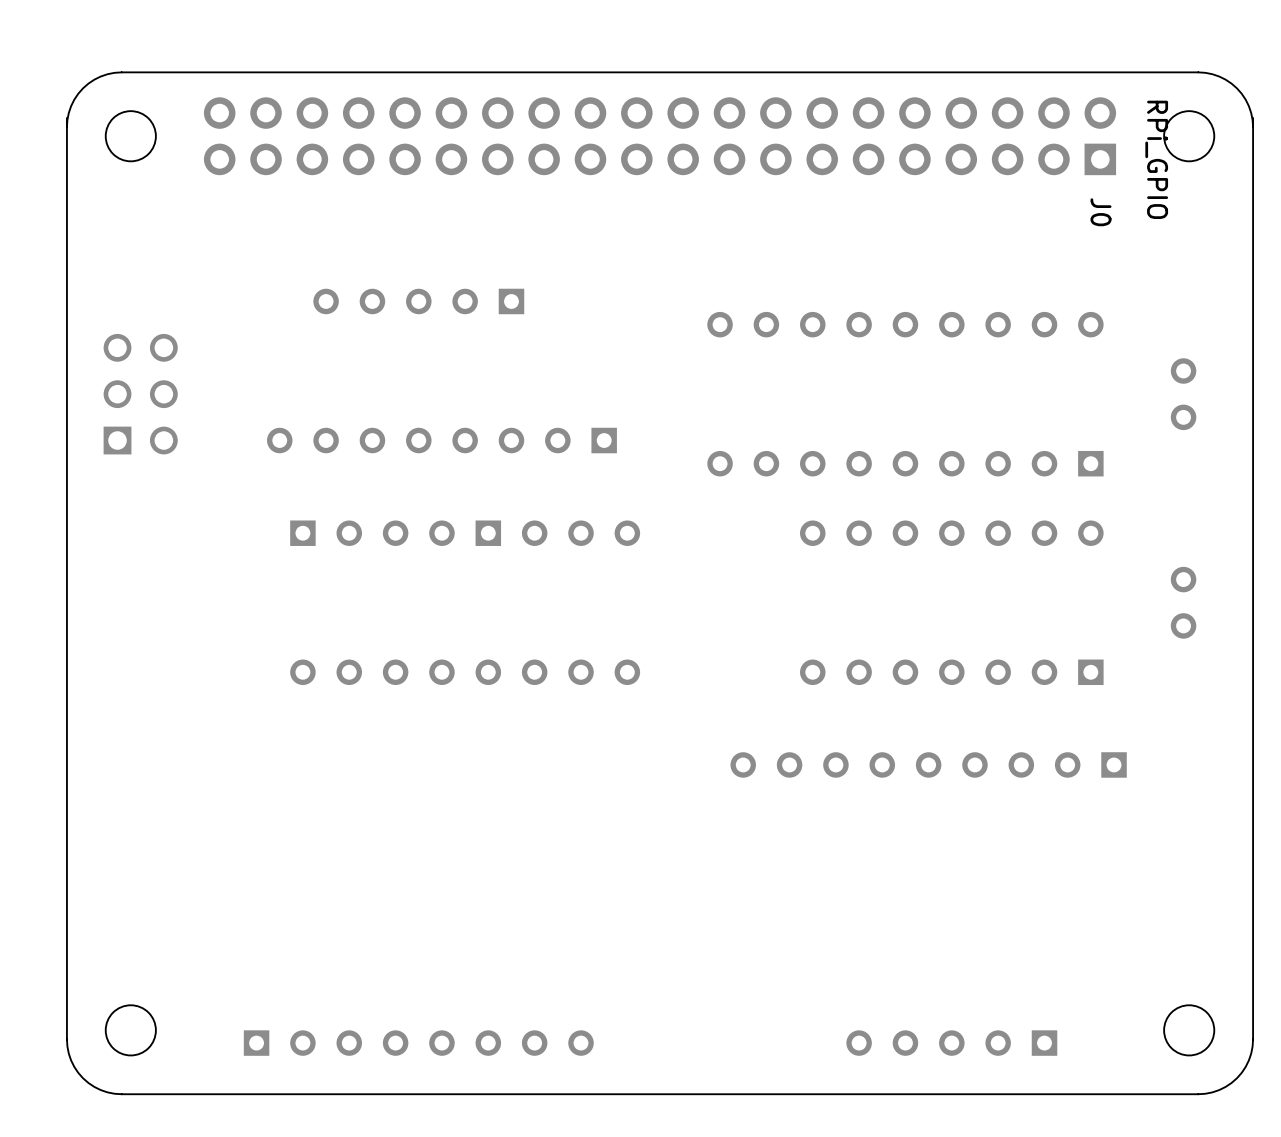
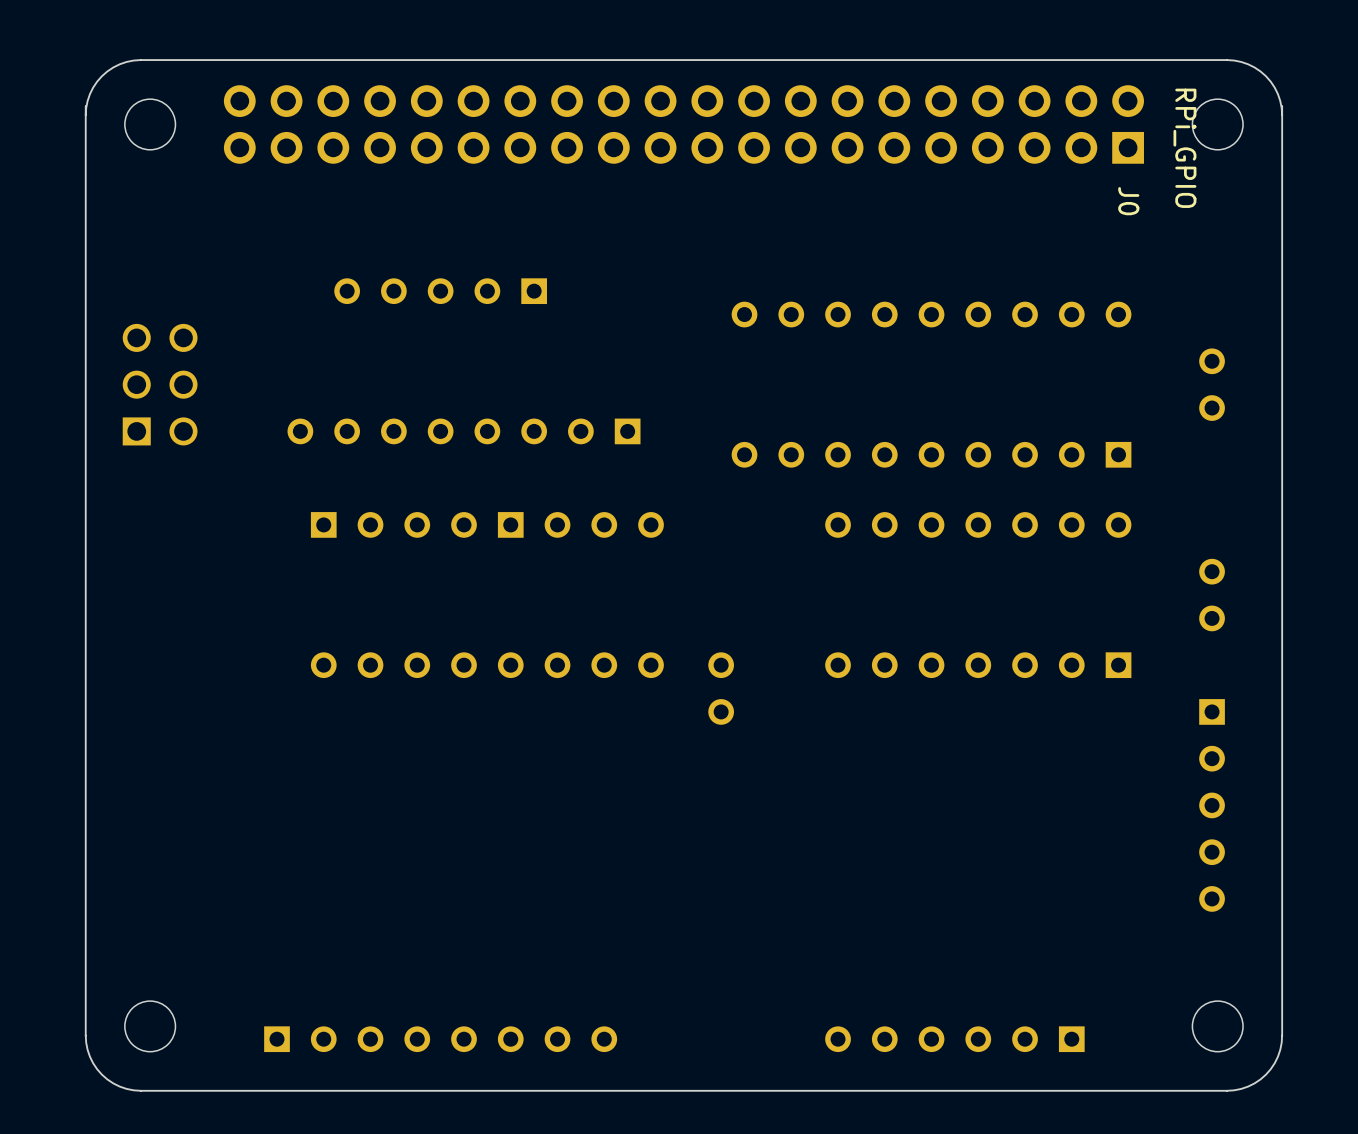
part: none -> (721, 688)
part: (928, 764) -> none
part: none -> (954, 1039)
part rotation: 0° (951, 1043) -> 90° counterclockwise (1212, 805)
part position: (951, 1043) -> (1212, 805)

